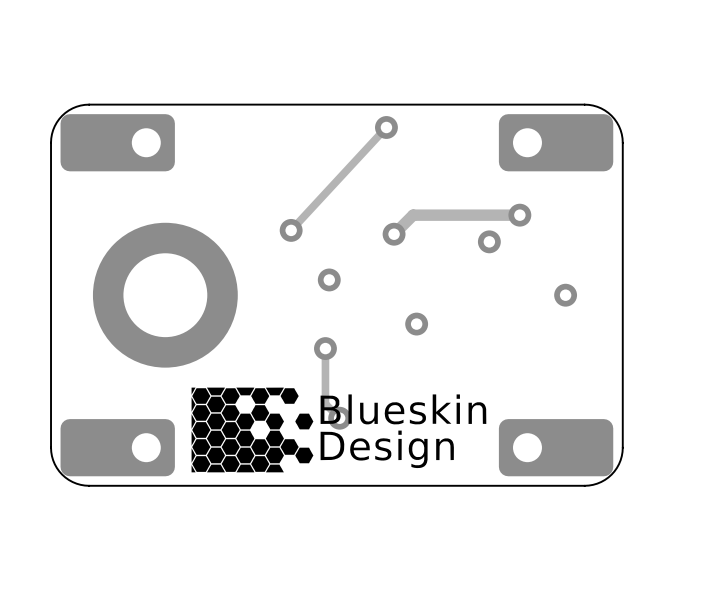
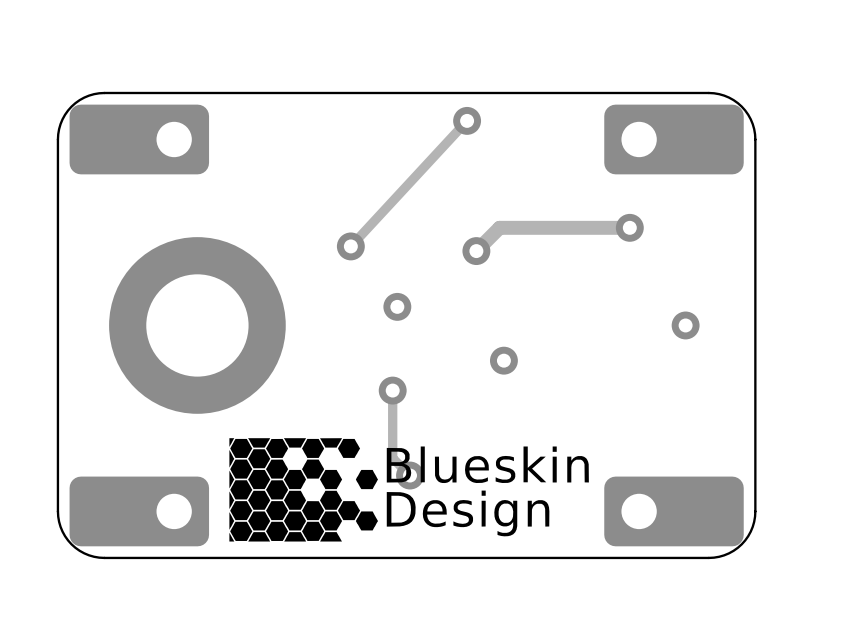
via: (489, 241) -> none

